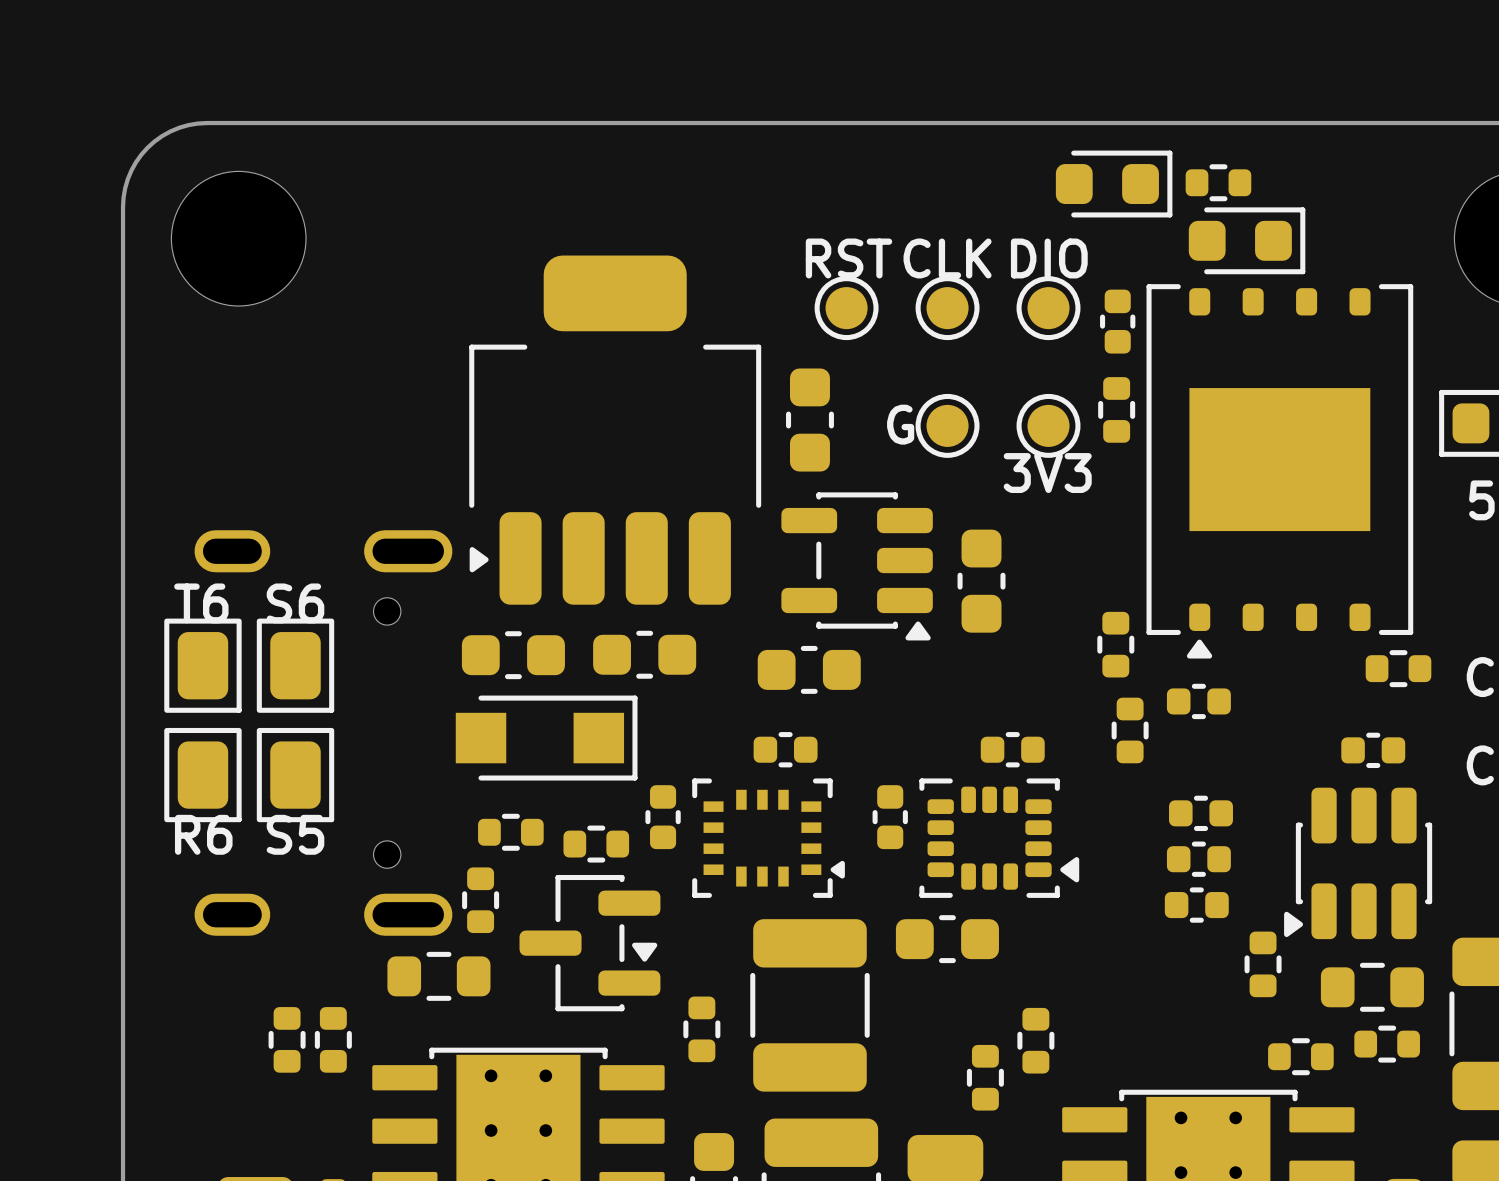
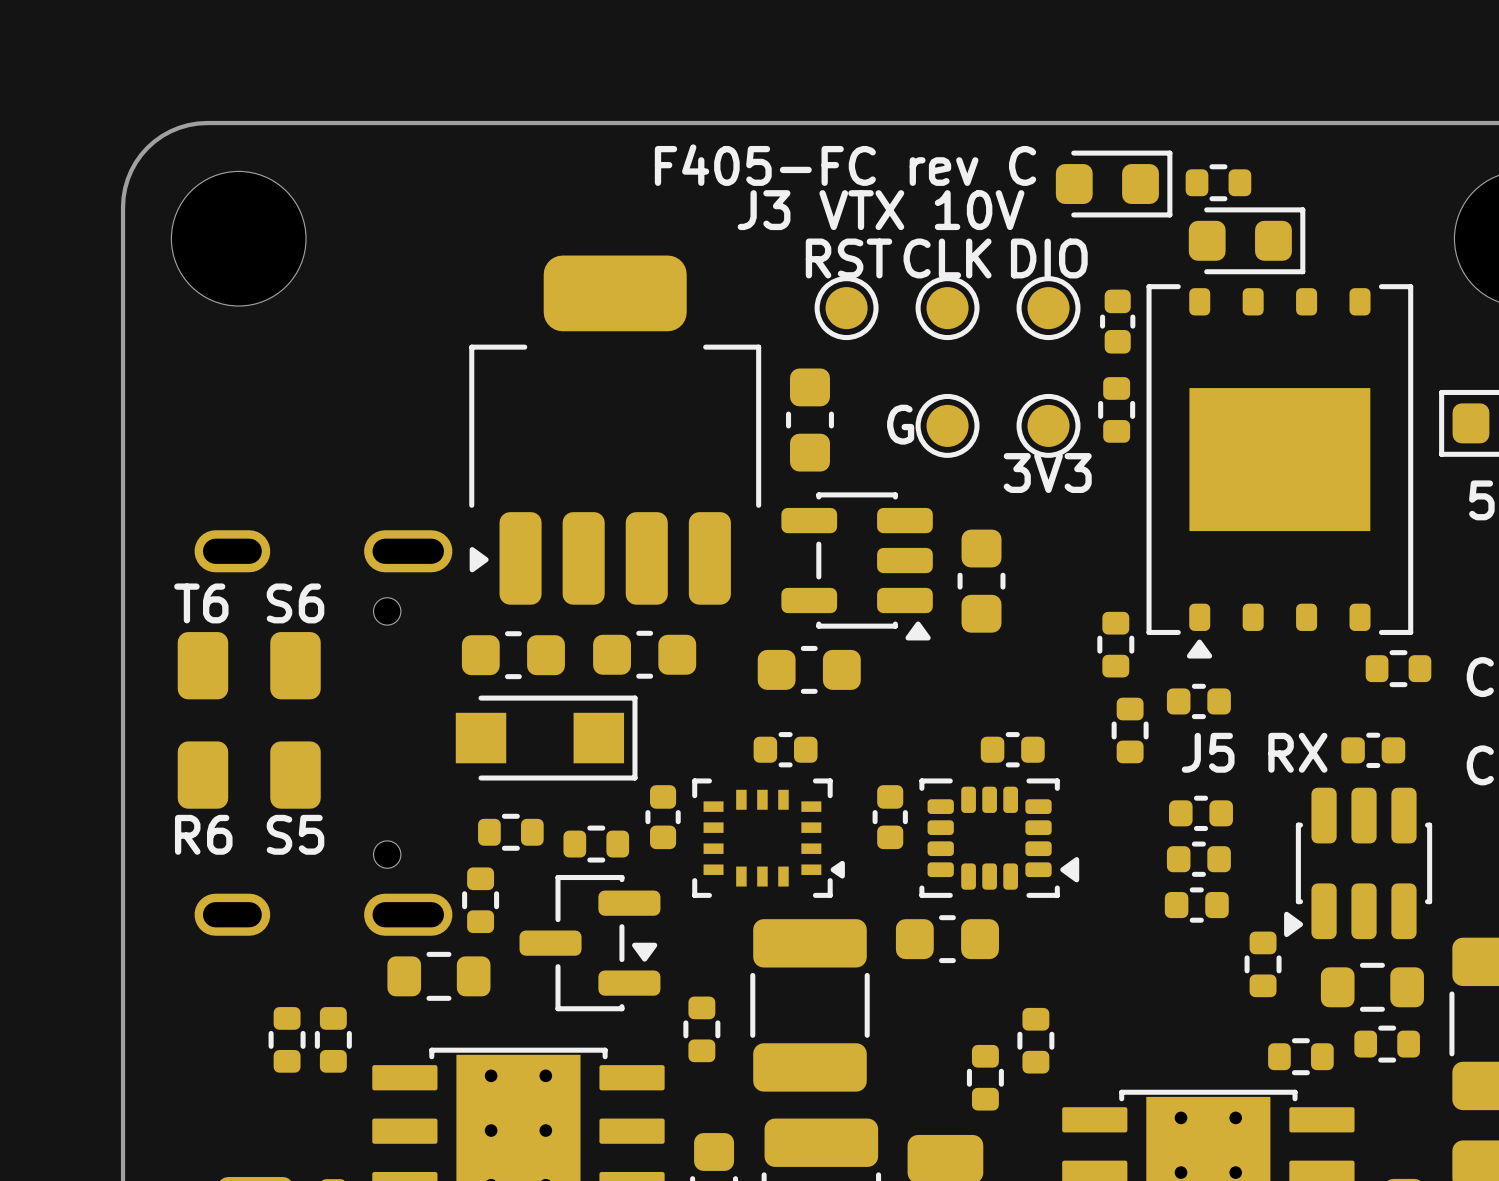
text: none -> F405-FC rev C (845, 165)
text: none -> J3 VTX 10V (881, 210)
part footprint: [164, 618, 242, 713] -> [177, 632, 229, 700]
part footprint: [256, 618, 335, 713] -> [270, 632, 321, 700]
part footprint: [164, 727, 242, 823] -> [177, 741, 229, 809]
part footprint: [256, 727, 335, 823] -> [270, 741, 321, 809]
text: none -> J5 RX (1254, 752)

